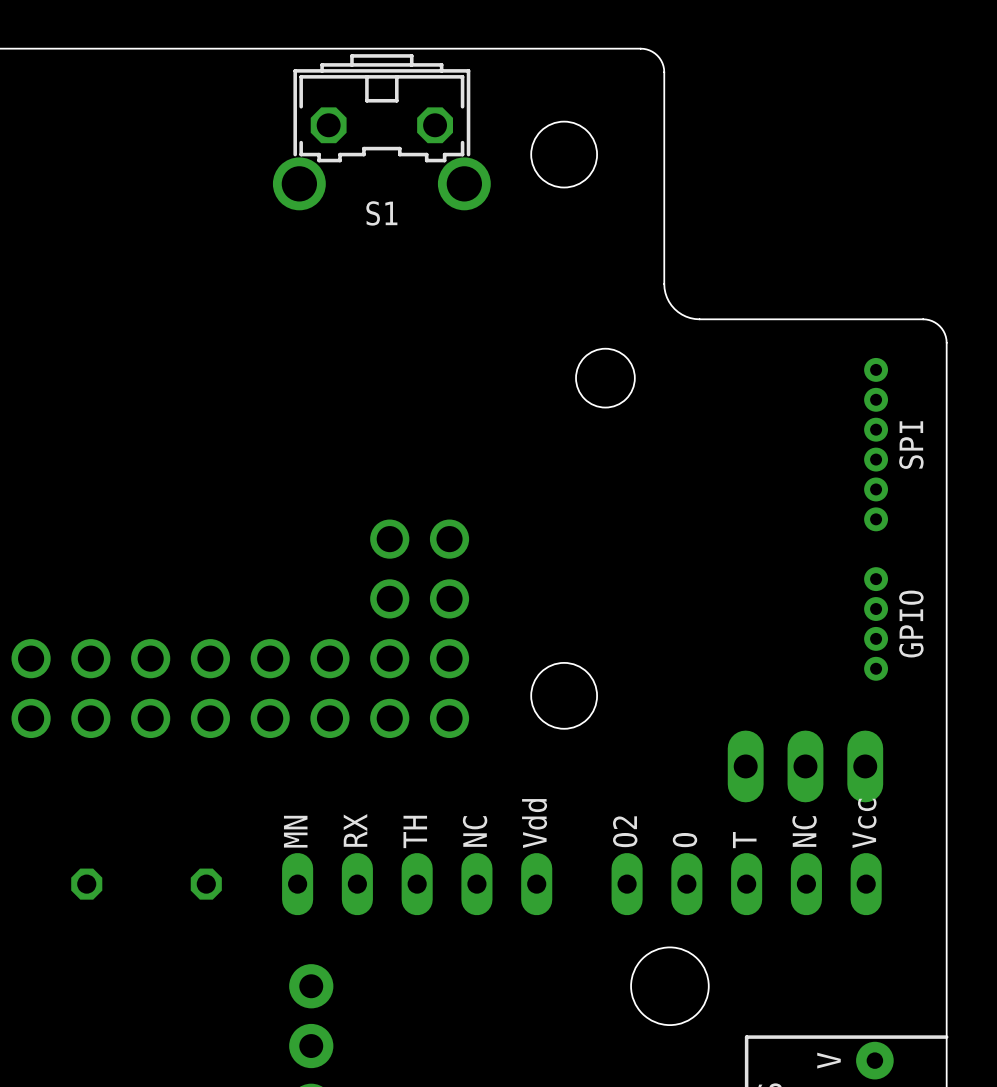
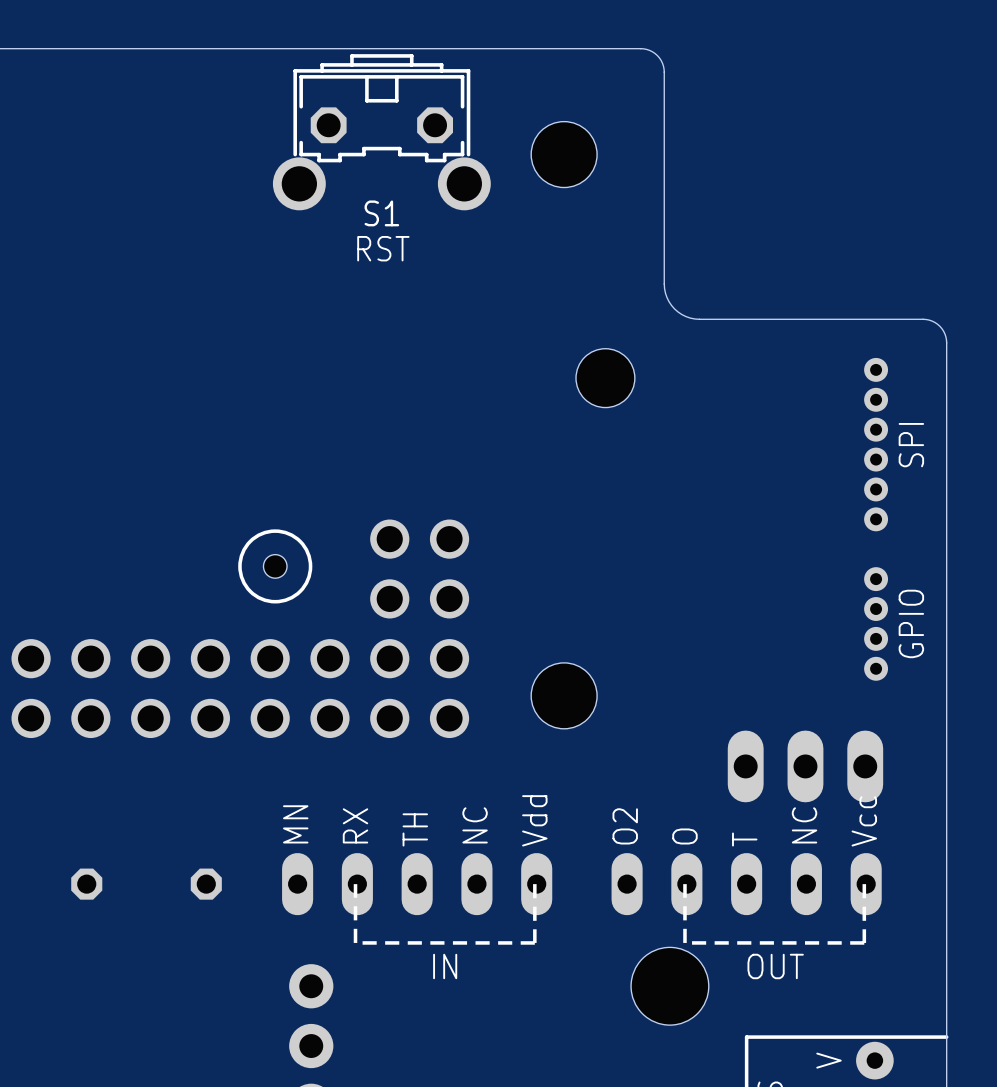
text: none -> RST (383, 248)
drawing: none -> [238, 529, 313, 604]
hole: none -> (275, 566)
line: none -> (534, 884) (534, 942) (355, 942) (355, 884)
line: none -> (864, 884) (864, 942) (684, 942) (684, 884)
text: none -> IN (445, 966)
text: none -> OUT (775, 966)

